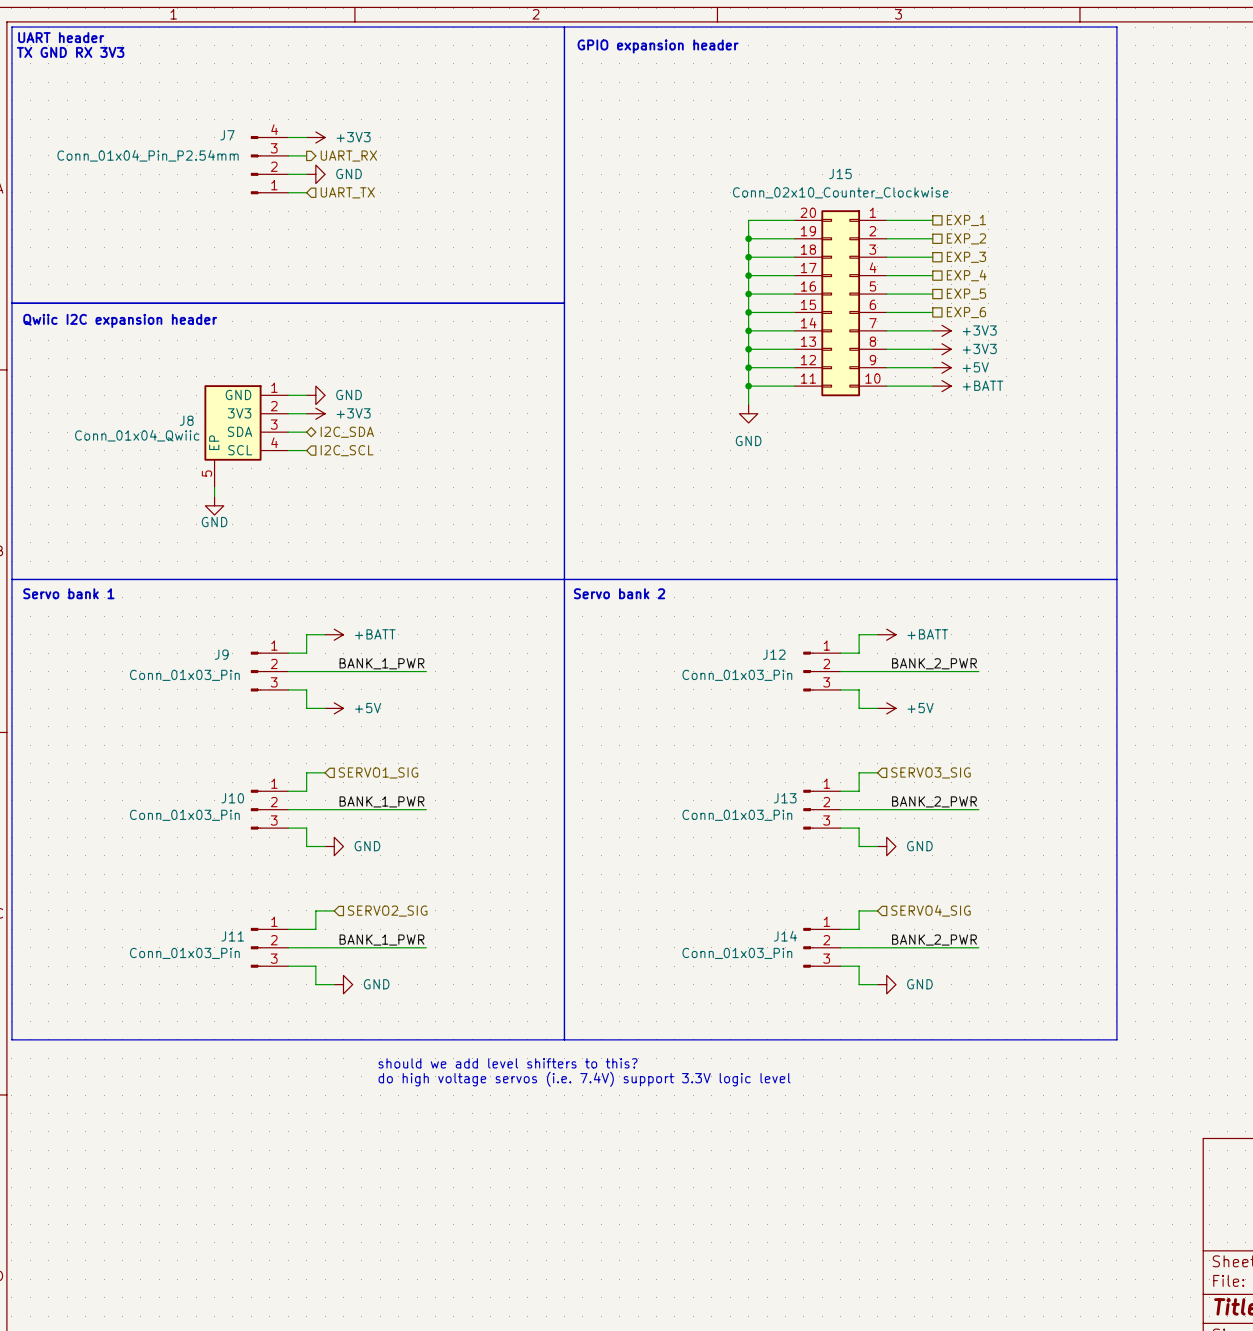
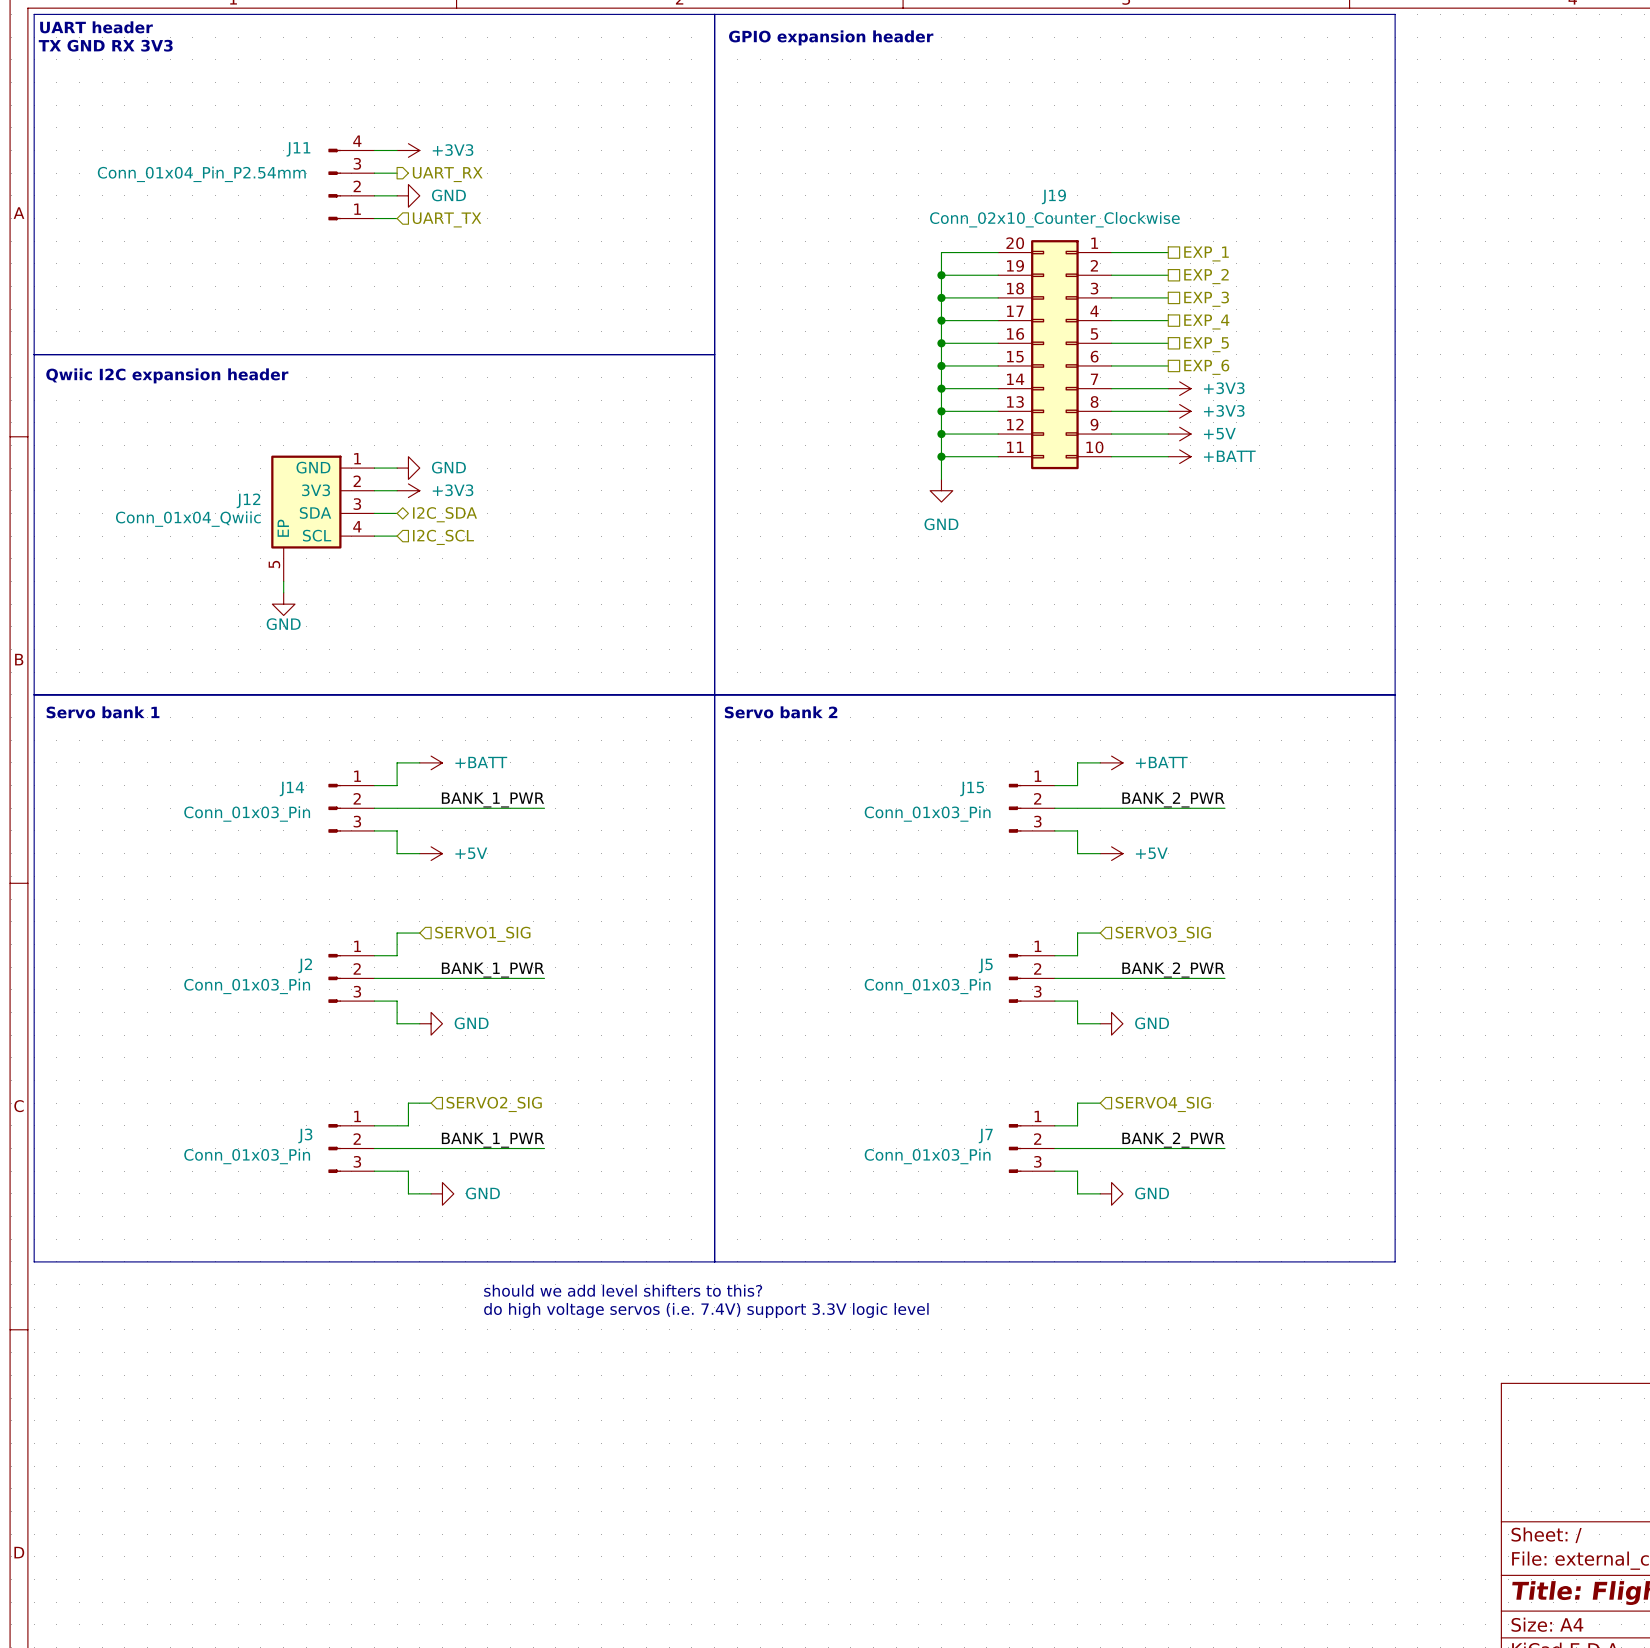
J7 name: J7 (227, 135) -> J11 (298, 149)
J15 name: J15 (840, 173) -> J19 (1053, 196)
J8 name: J8 (186, 420) -> J12 (248, 500)
J9 name: J9 (221, 654) -> J14 (291, 789)
J12 name: J12 (774, 654) -> J15 (972, 789)
J10 name: J10 (232, 798) -> J2 (305, 965)
J13 name: J13 (785, 798) -> J5 (985, 965)
J11 name: J11 (232, 936) -> J3 (305, 1135)
J14 name: J14 (785, 936) -> J7 (985, 1136)

